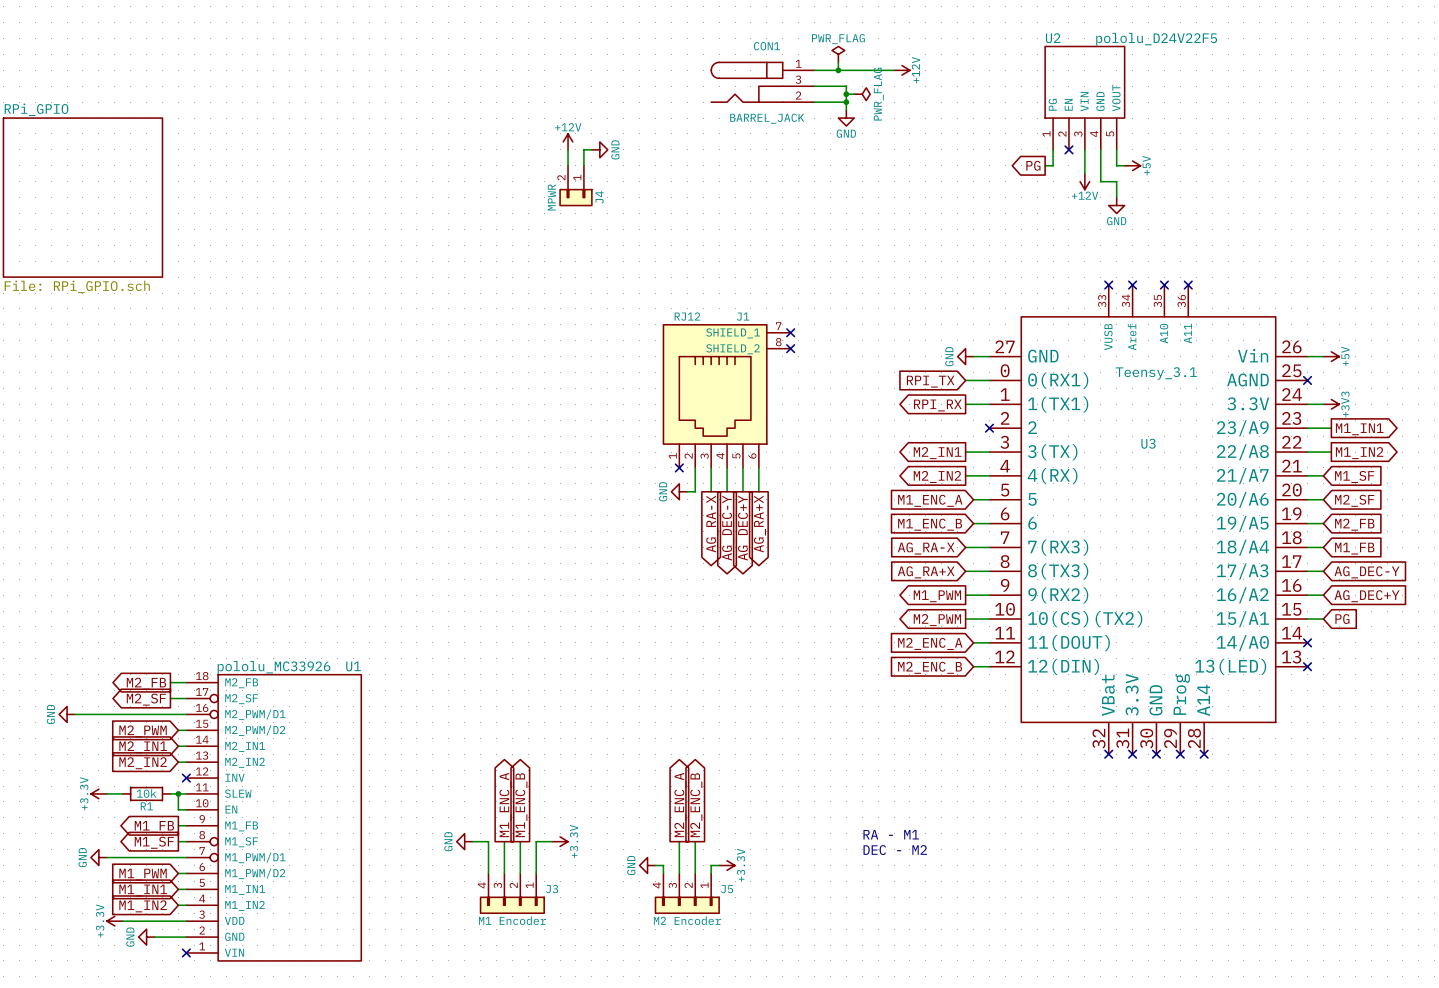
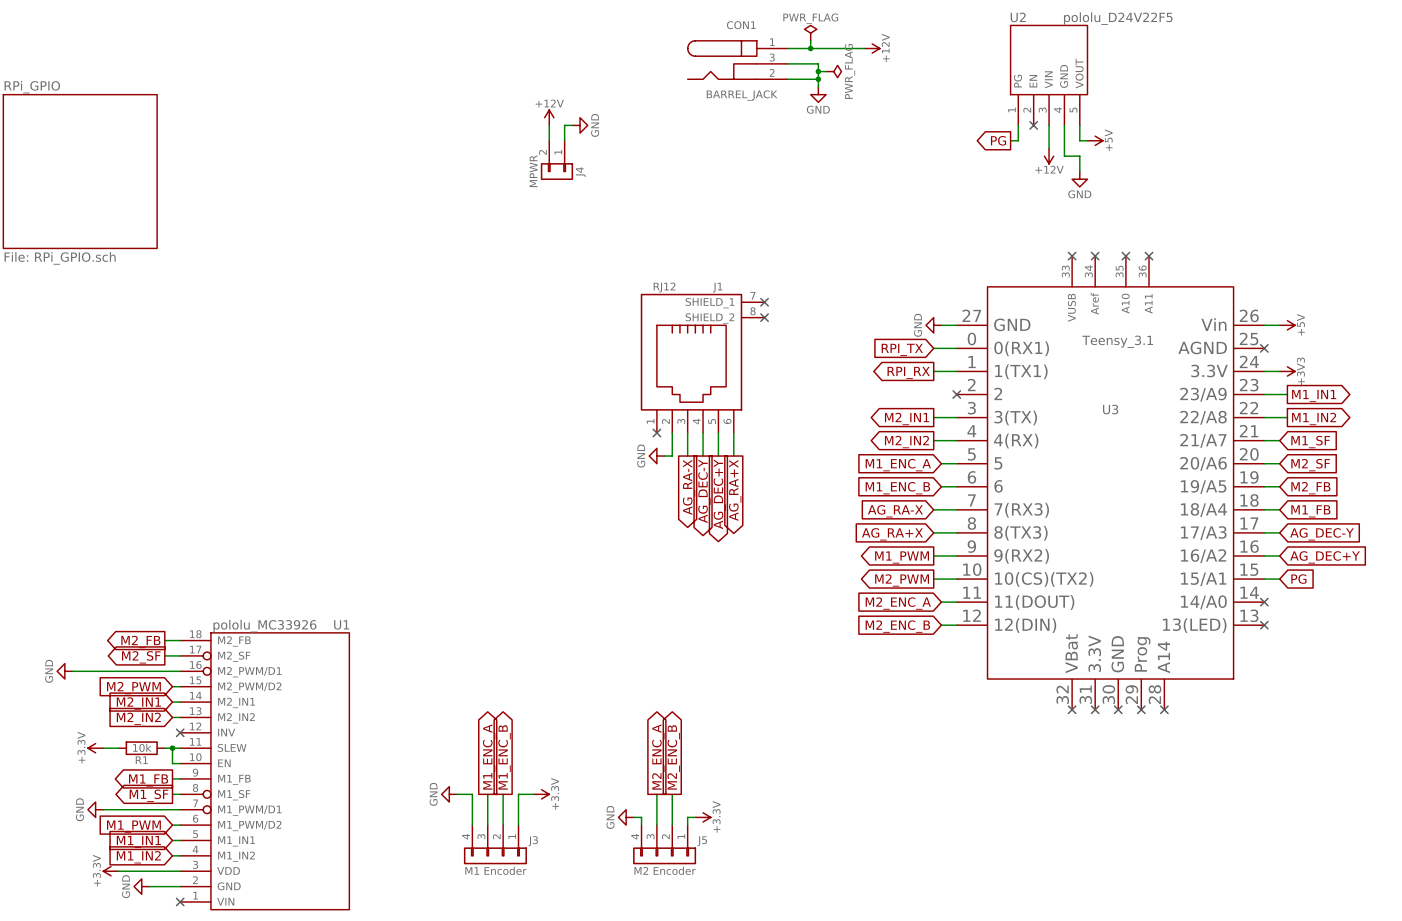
text: RA - M1 (891, 834) -> none
text: DEC - M2 (895, 850) -> none

